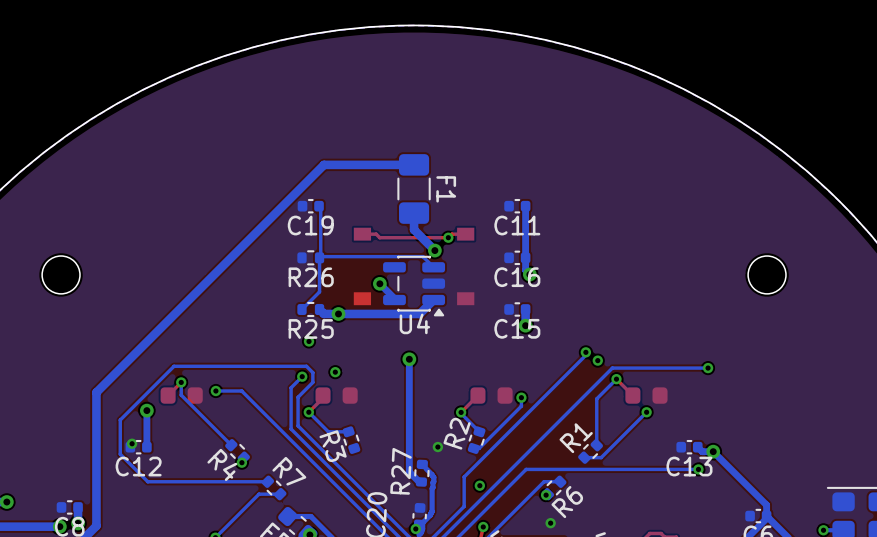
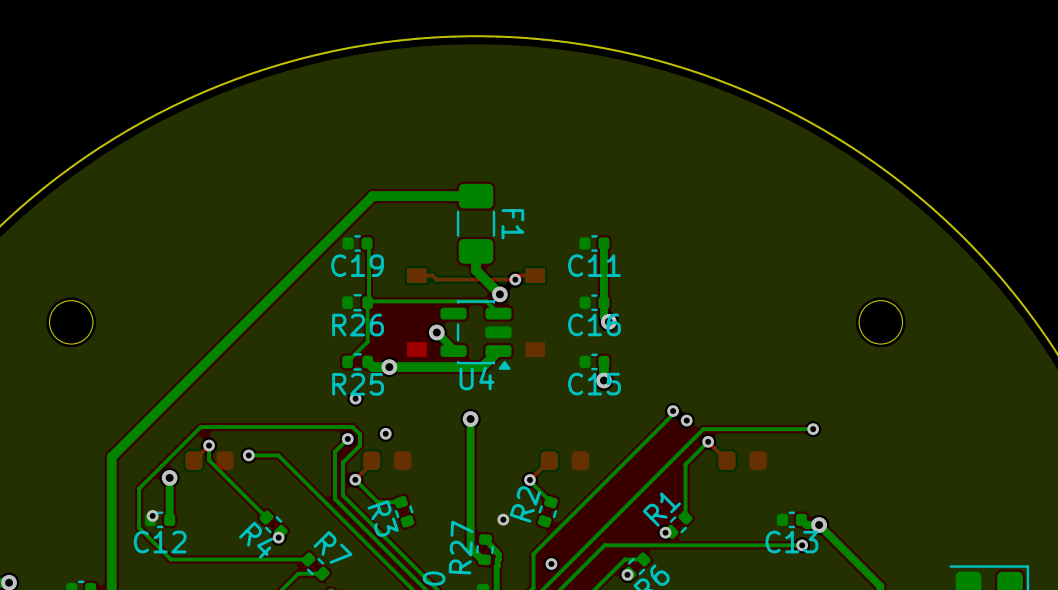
bottom track: (521, 397) (521, 406) (479, 448) (473, 448) -> none
via: (521, 397) -> none
bottom track: (646, 412) (601, 457) (584, 457) -> none
via: (646, 412) -> none
via: none -> (665, 532)

